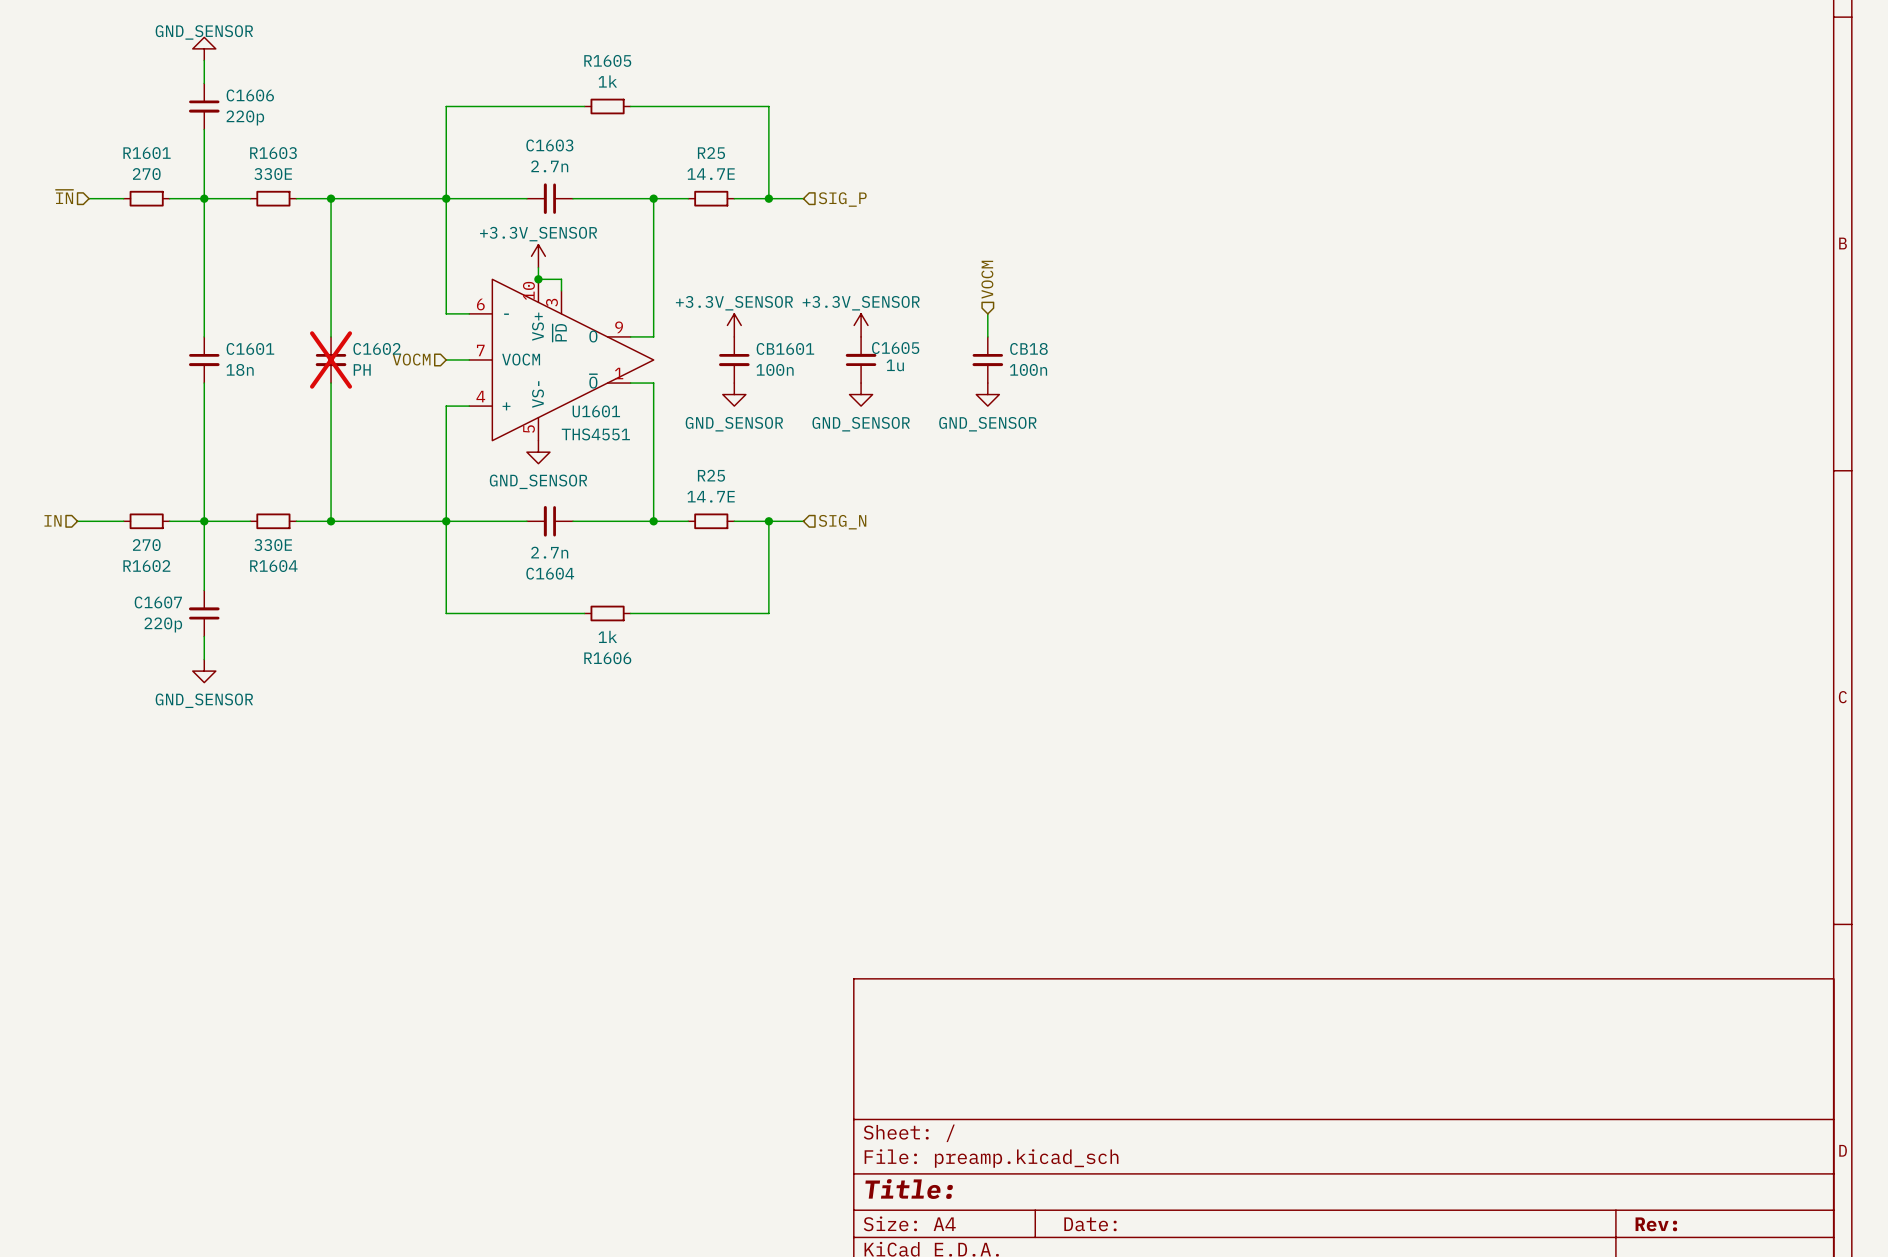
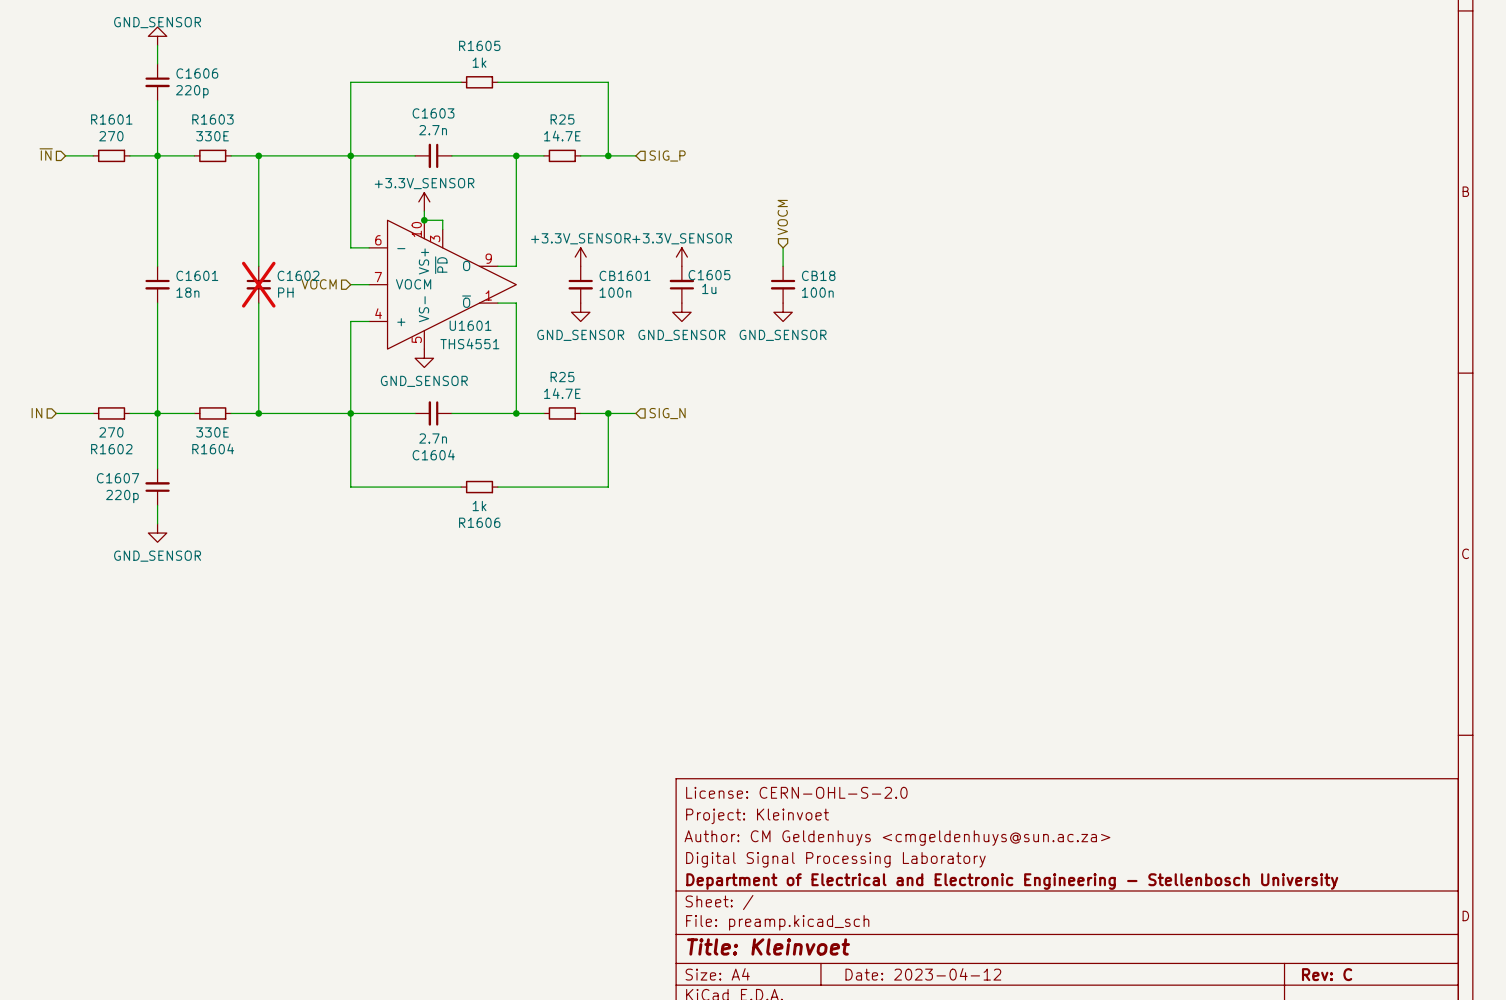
title block: none -> License: CERN-OHL-S-2.0 (796, 792)
title block: none -> Project: Kleinvoet (757, 816)
title block: none -> Author: CM Geldenhuys <cmgeldenhuys@sun.ac.za> (897, 838)
title block: none -> Digital Signal Processing Laboratory (835, 859)
title block: none -> Department of Electrical and Electronic Engineering - Stellenbosch University (1012, 881)
title block: Title: (909, 1189) -> Title: Kleinvoet (768, 946)
title block: Date: (1090, 1224) -> Date: 2023-04-12 (923, 974)
title block: Rev: (1656, 1224) -> Rev: C (1327, 974)

